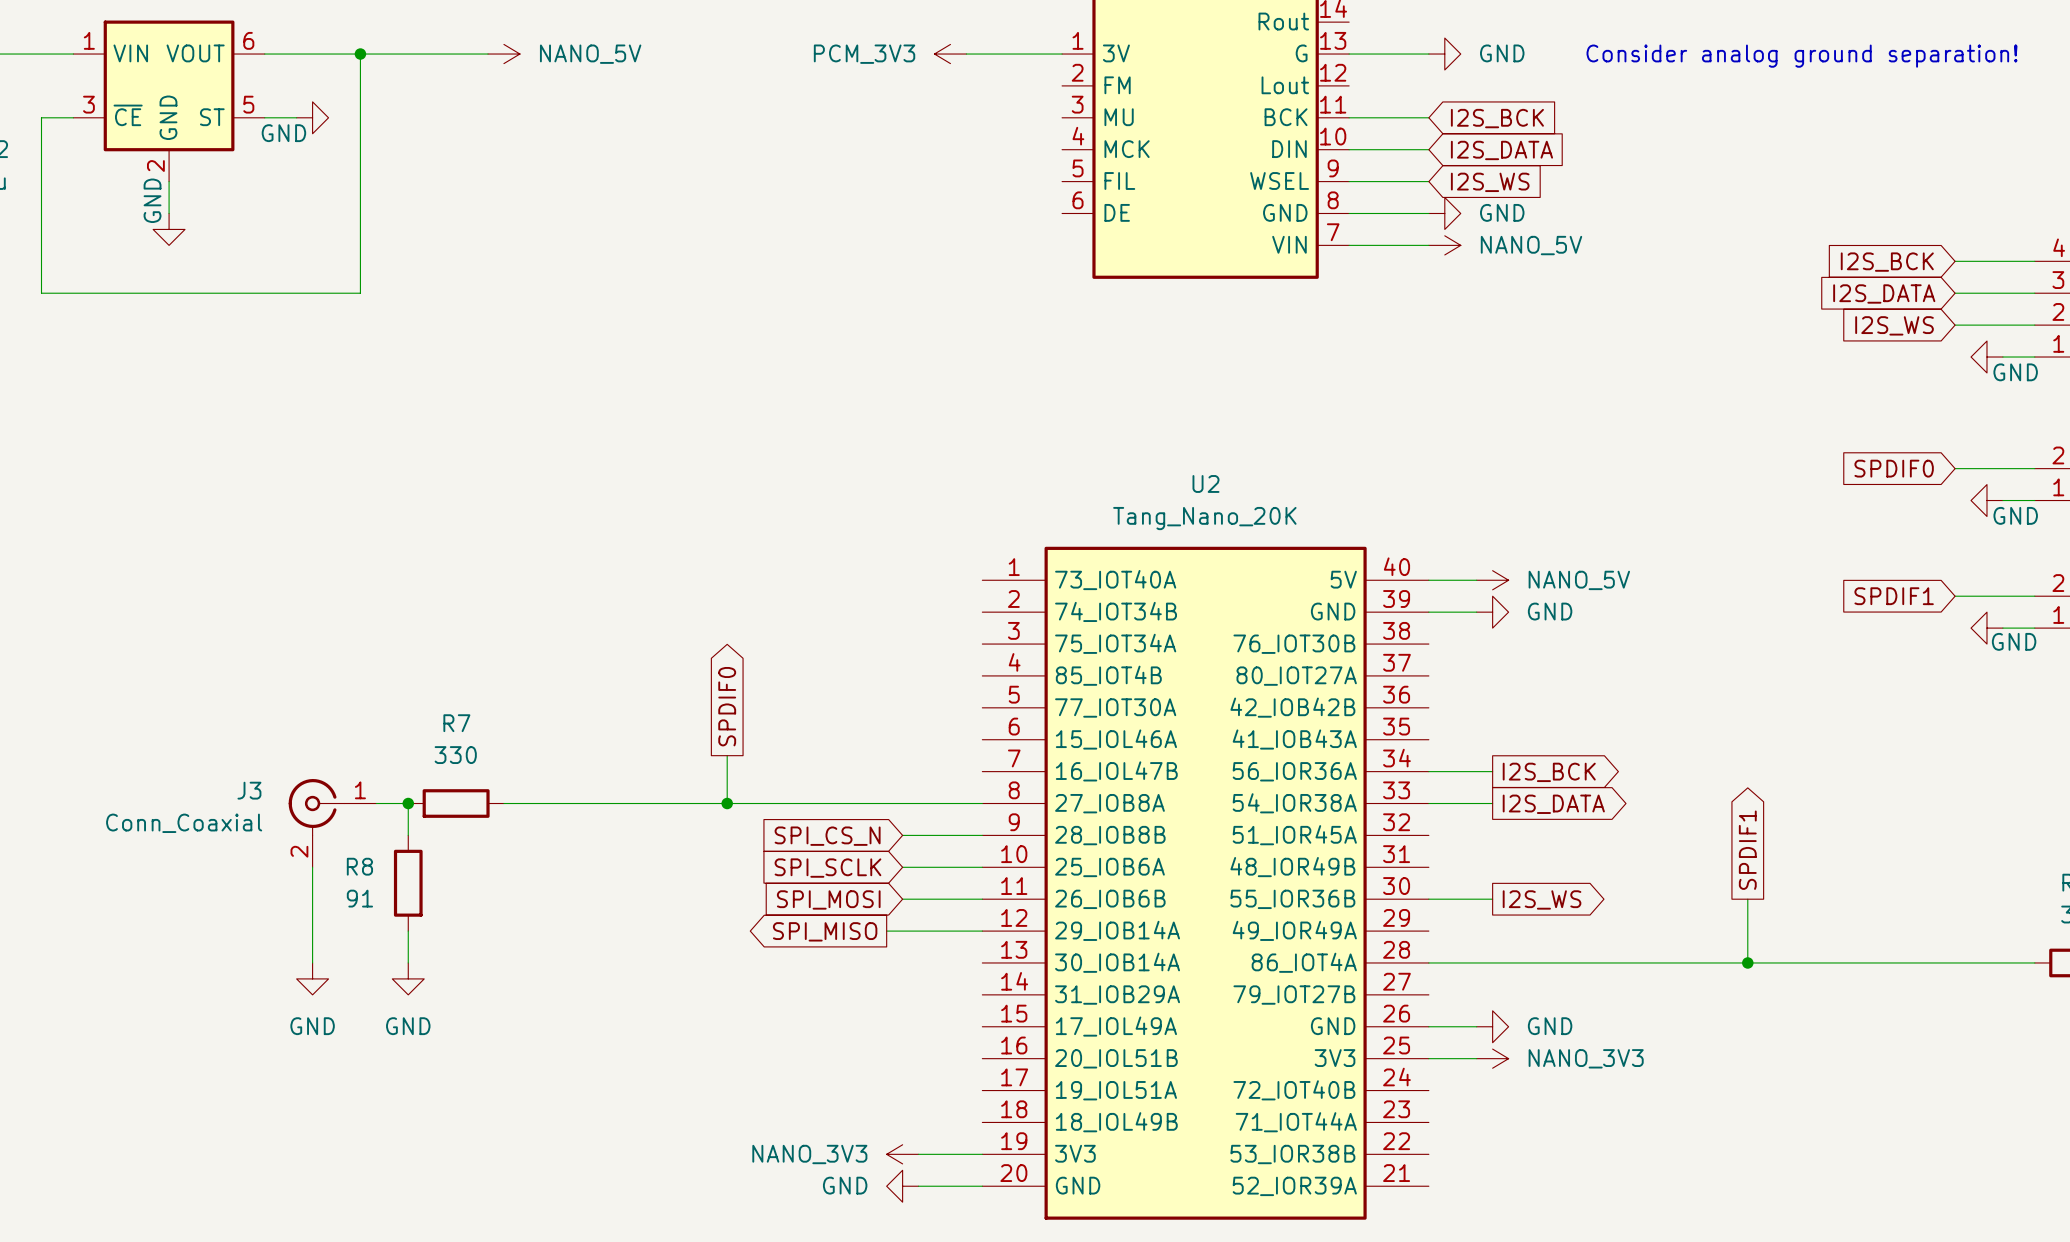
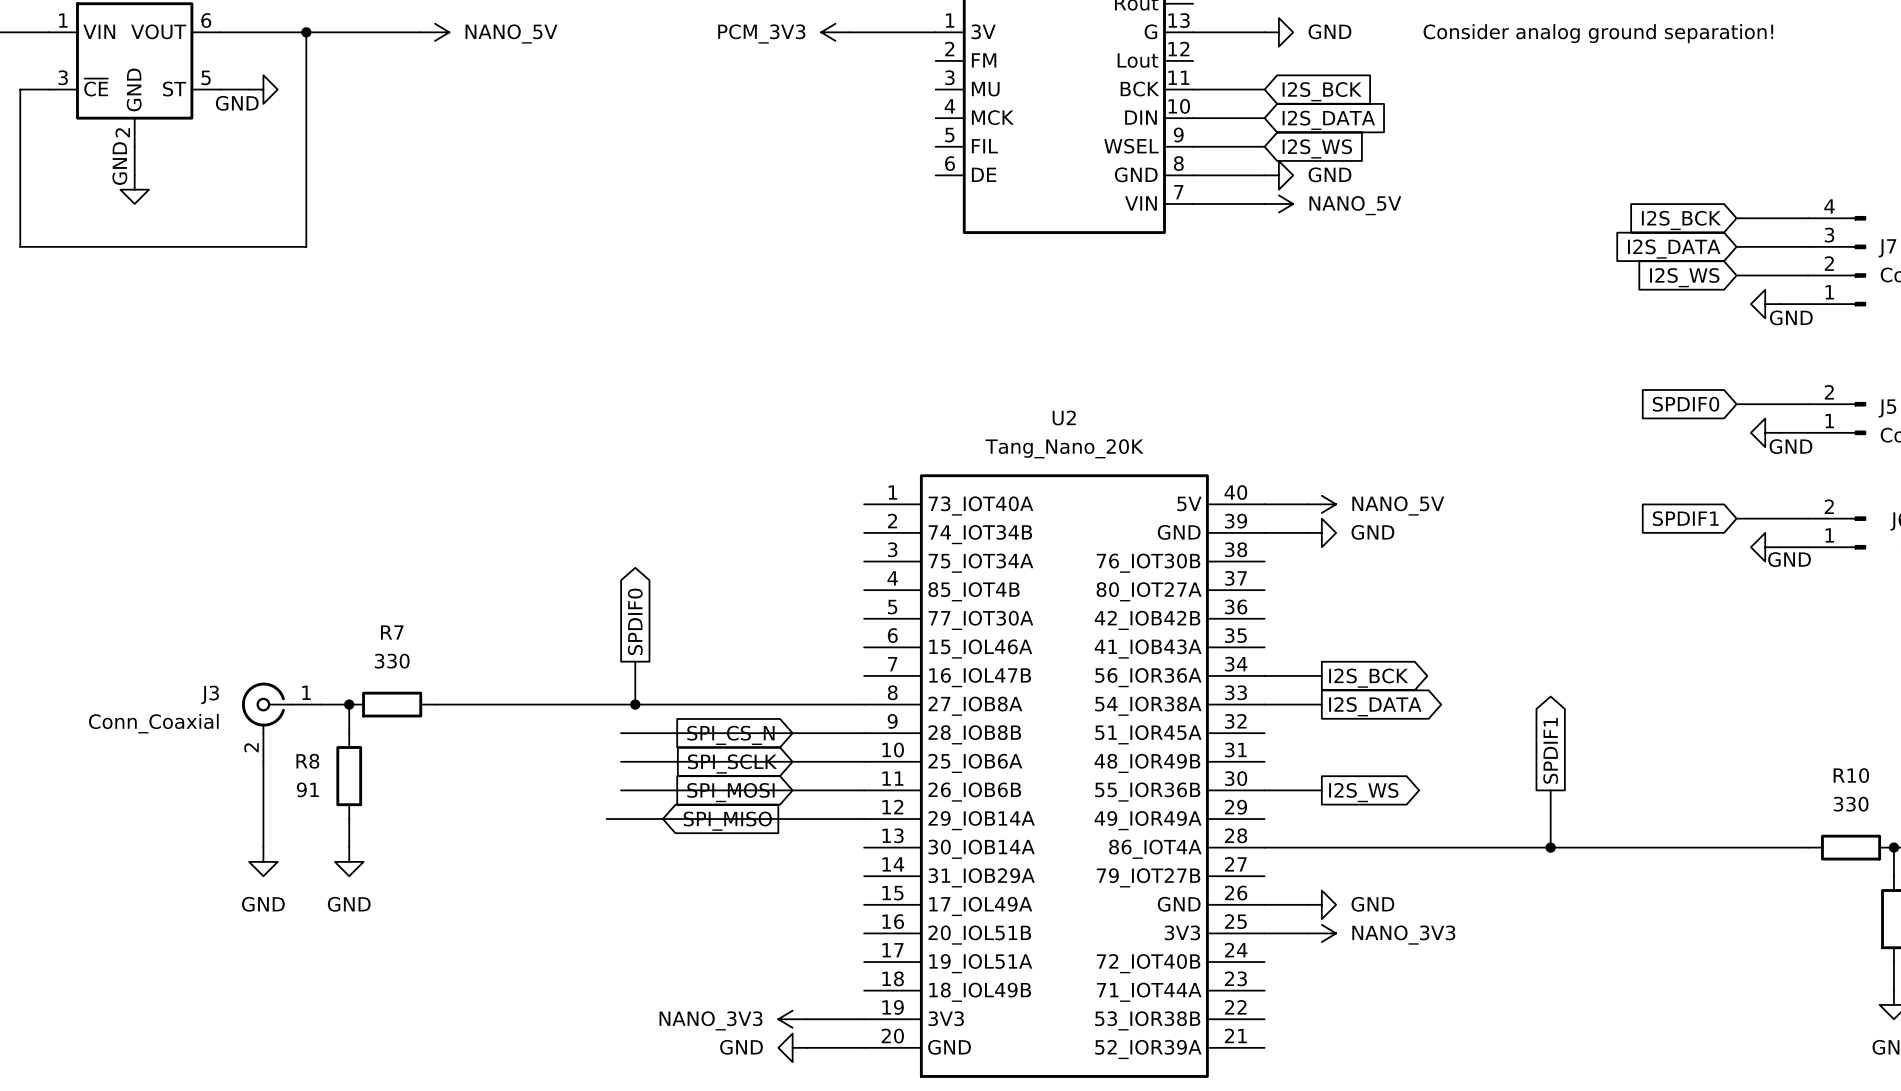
wire: none -> (620, 733) (792, 733)
wire: none -> (620, 761) (792, 761)
wire: none -> (620, 790) (792, 790)
wire: none -> (606, 819) (778, 819)

